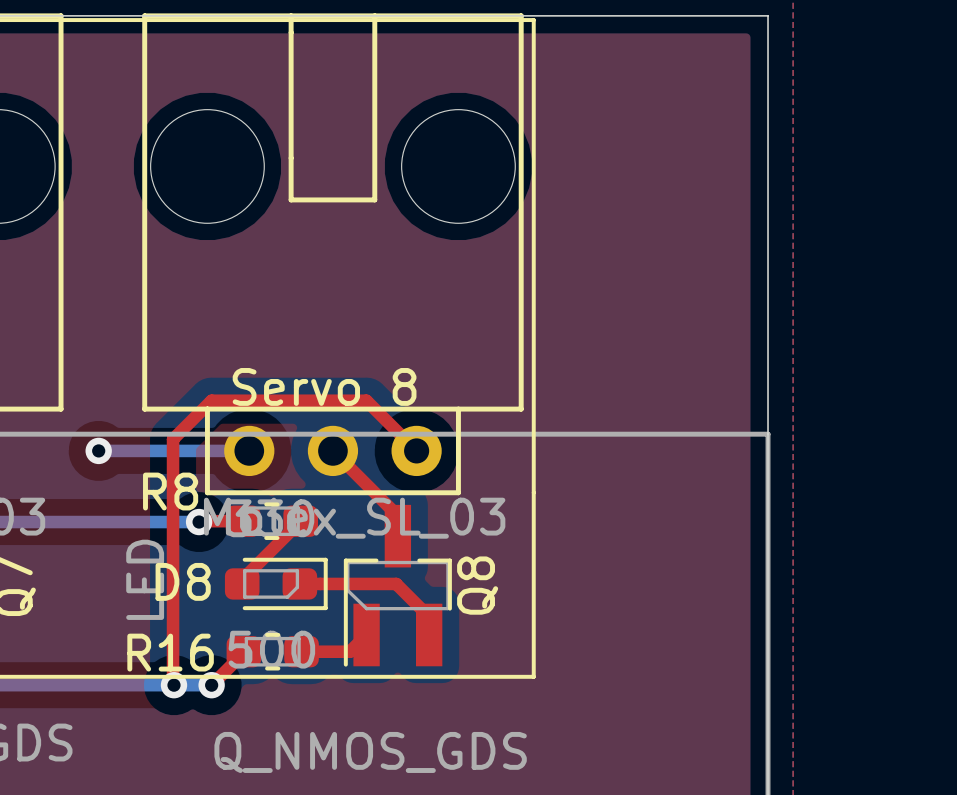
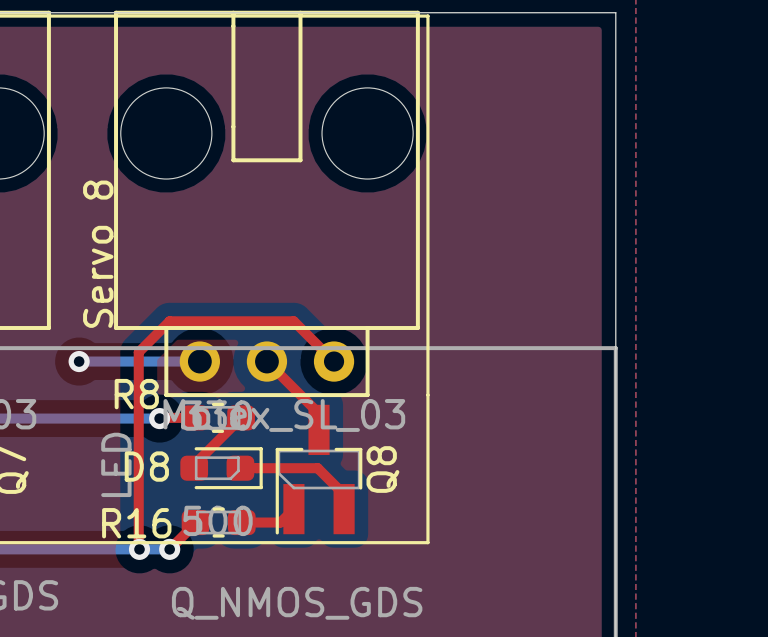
text rotation: 0° (324, 386) -> 90° counterclockwise (98, 254)

